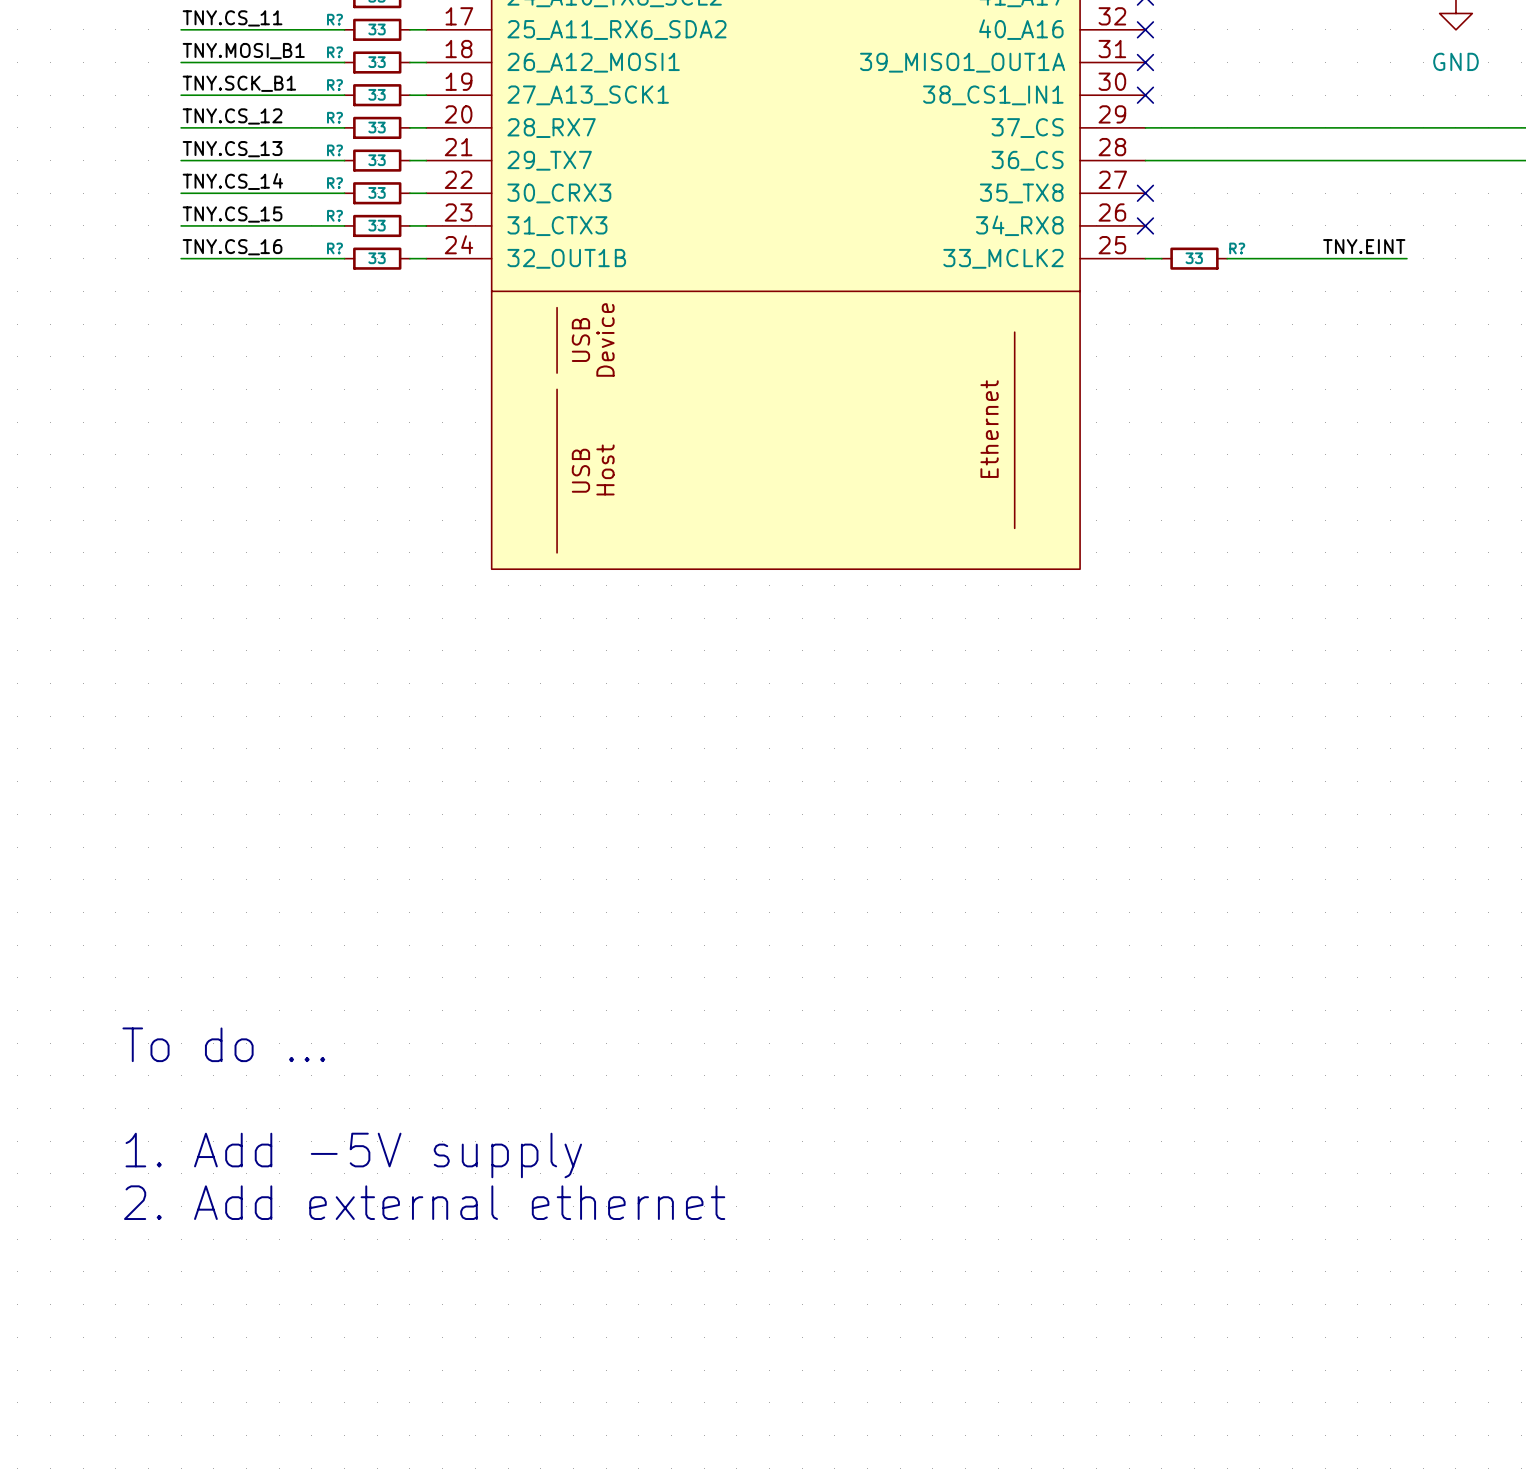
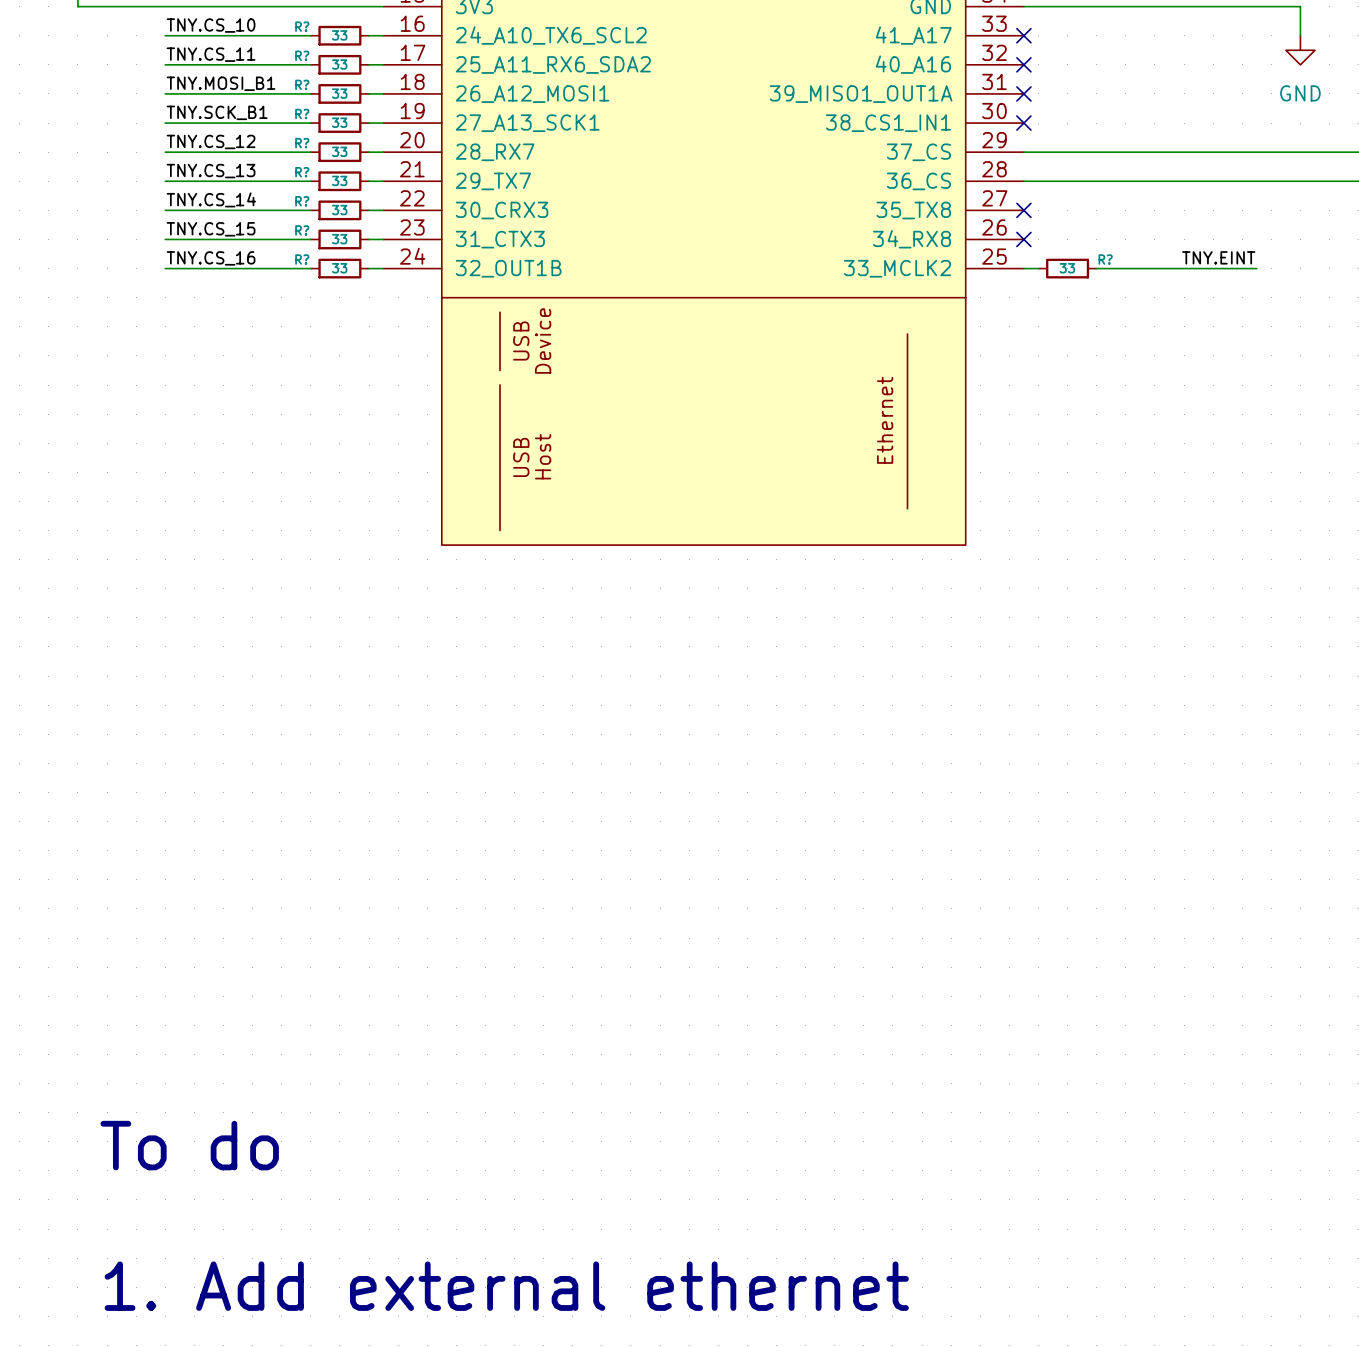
text: To do ... (223, 1044) -> none
text: 1. Add -5V supply (353, 1155) -> none
text: 2. Add external ethernet (424, 1202) -> none
text: none -> To do (189, 1145)
text: none -> 1. Add external ethernet (506, 1286)

